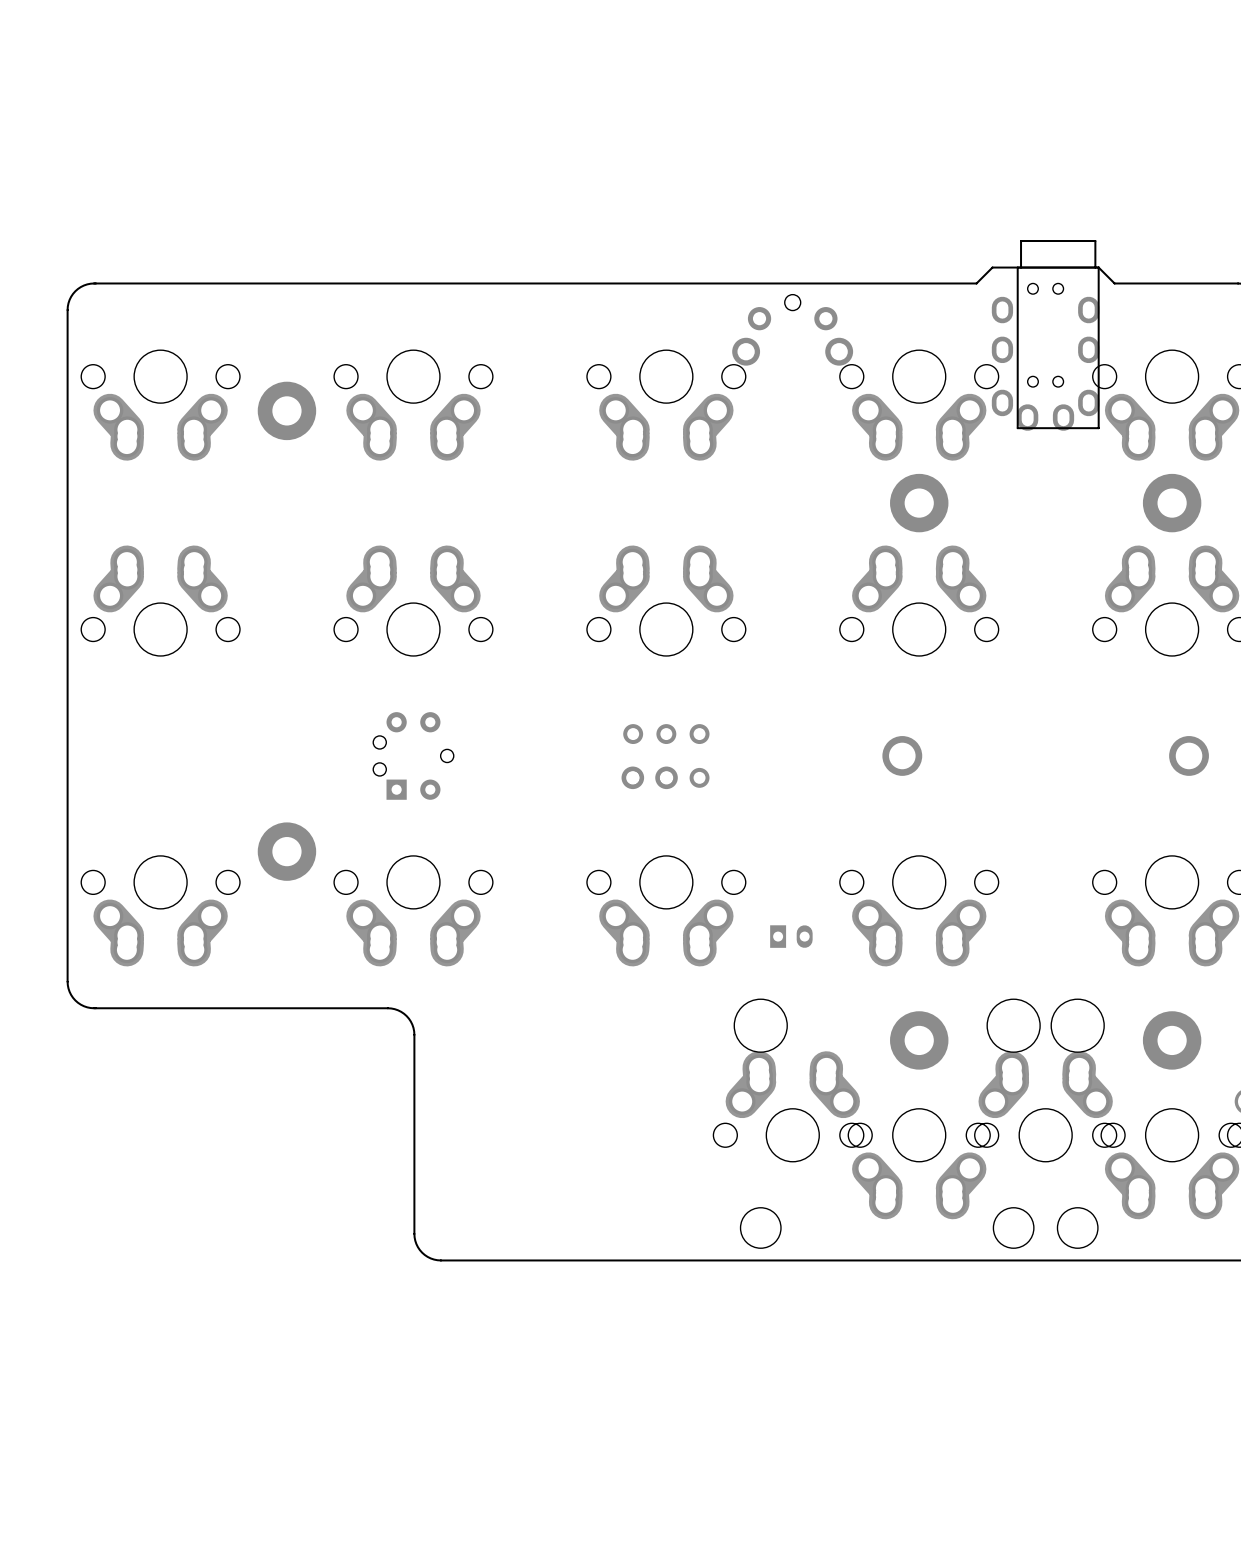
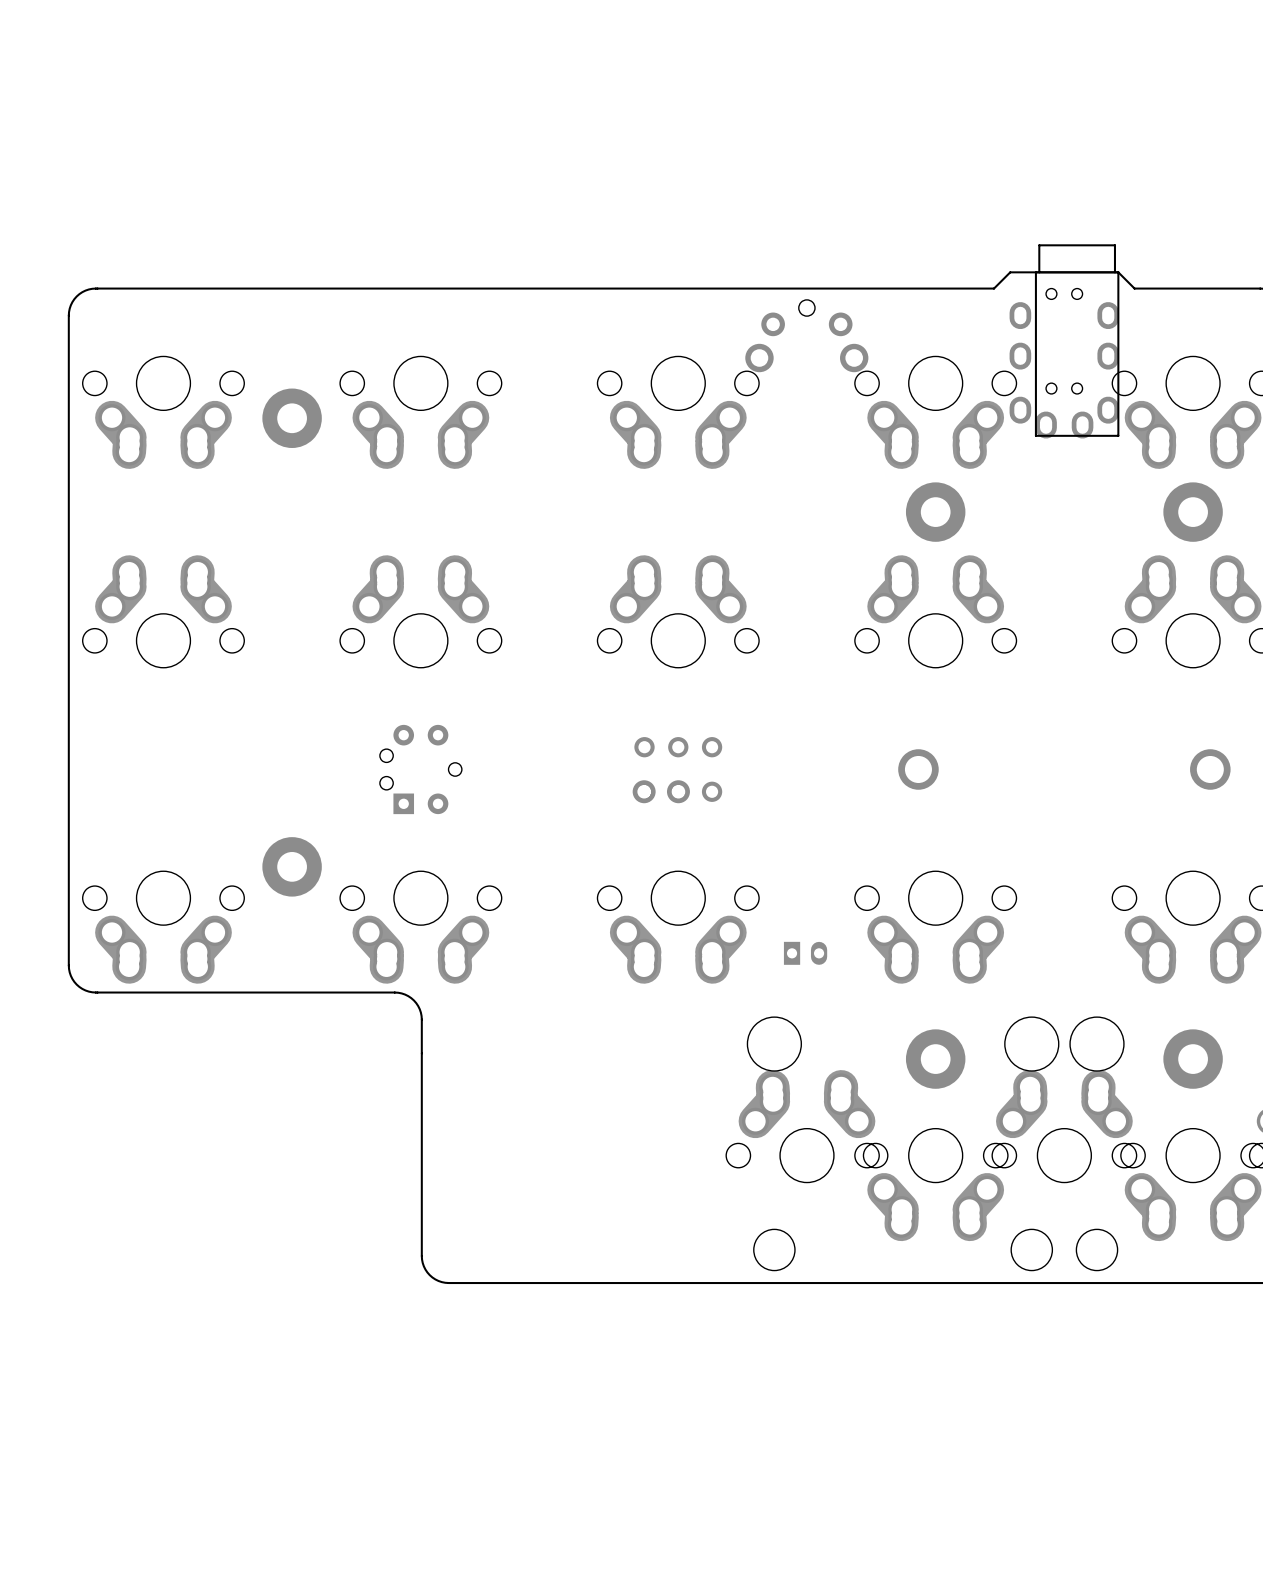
board edge: (67, 948) (68, 988) (75, 1000) (87, 1007) (391, 1008) (401, 1011) (408, 1018) (414, 1034) -> (68, 965) (74, 981) (82, 988) (92, 992) (401, 993) (413, 1000) (420, 1012) (421, 1053)

